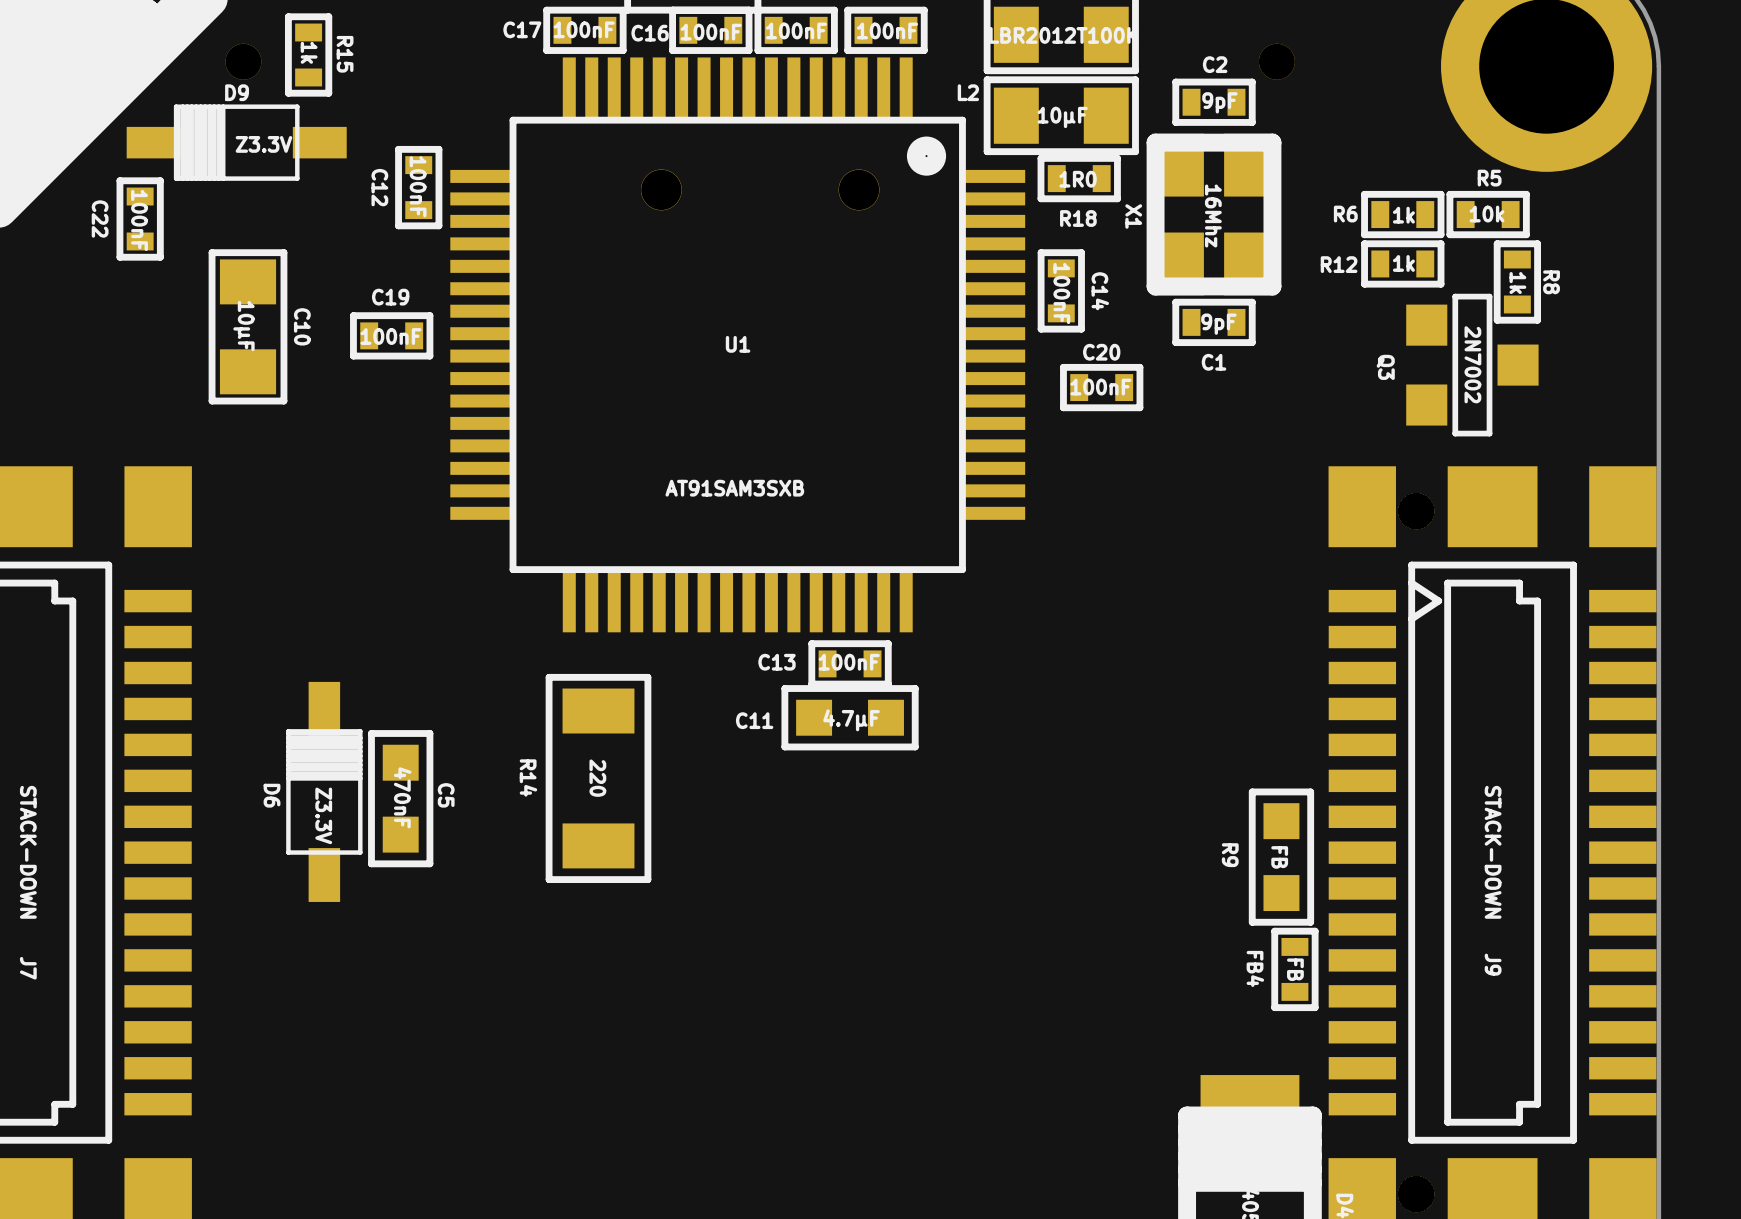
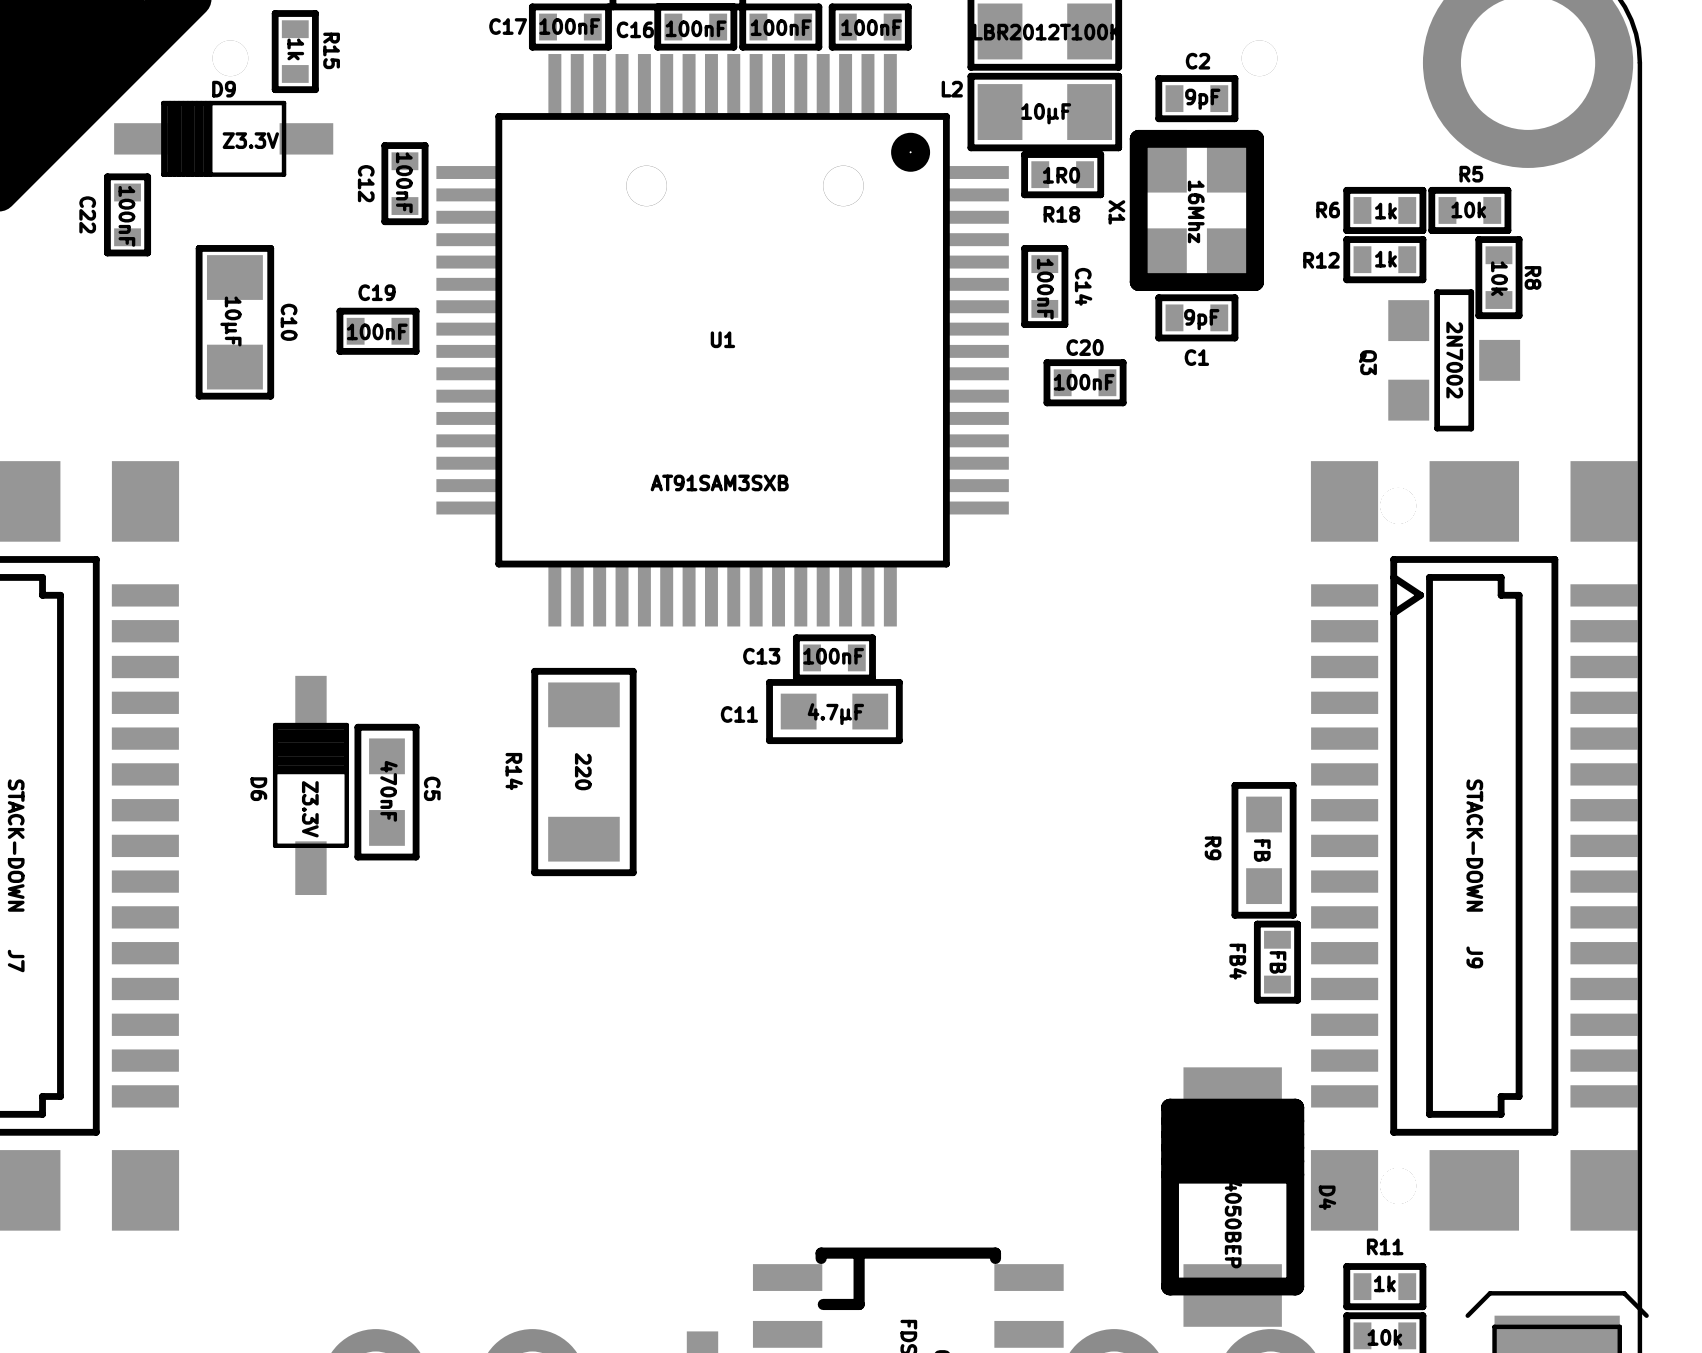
R8 value: 1k (1517, 283) -> 10k (1499, 278)

